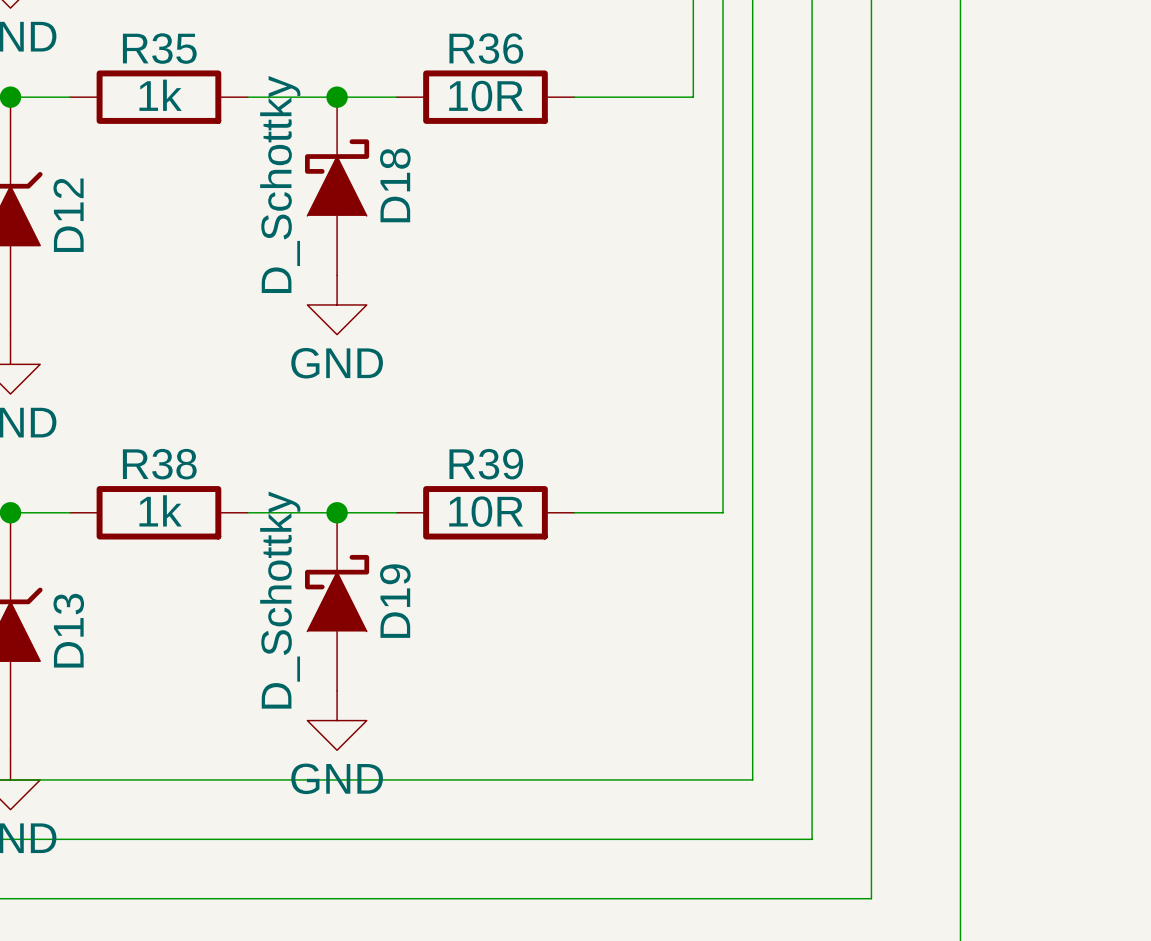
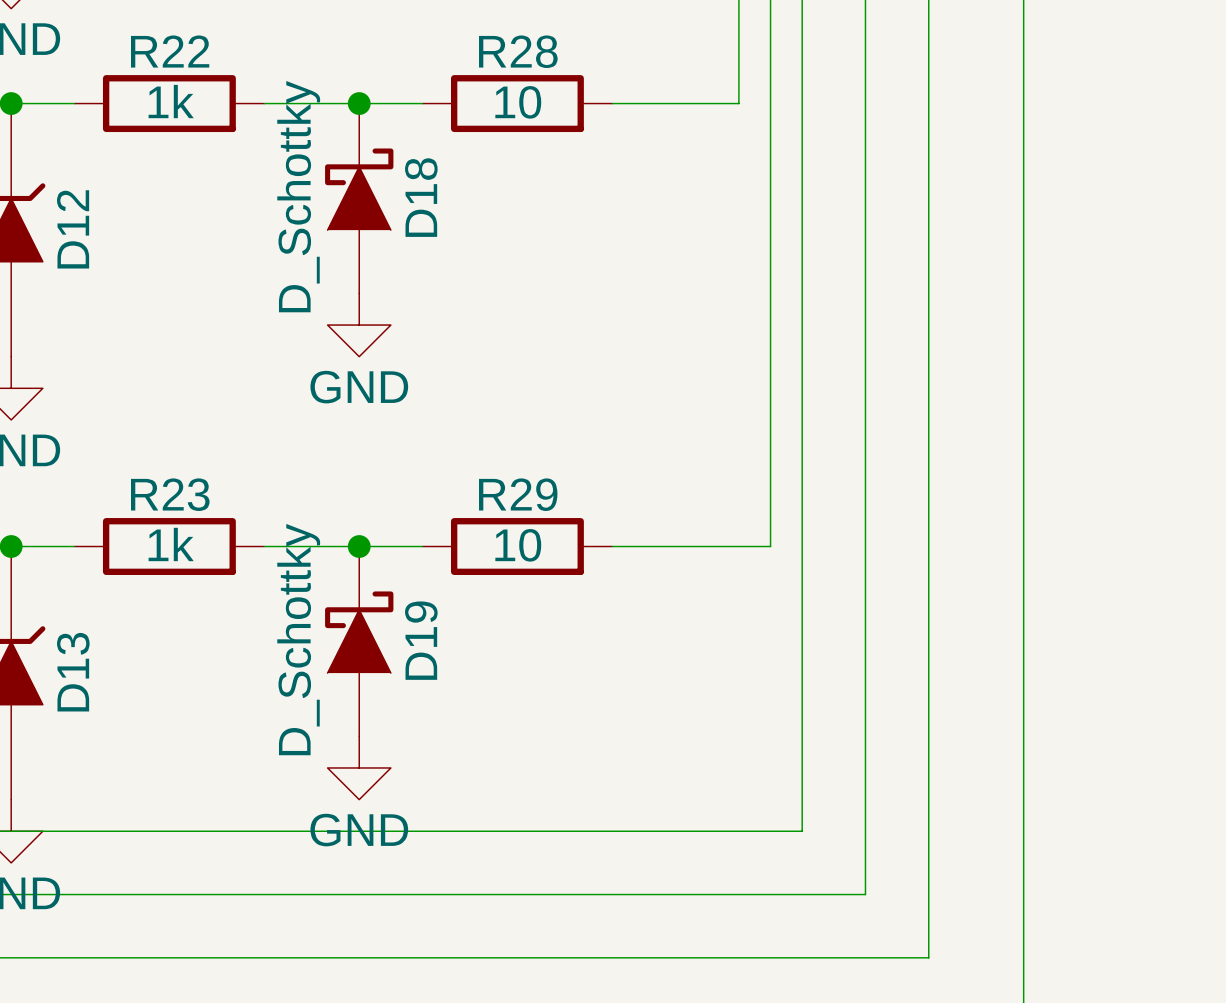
R35 name: R35 (159, 48) -> R22 (170, 51)
R36 name: R36 (486, 48) -> R28 (518, 51)
R36 value: 10R (486, 96) -> 10 (518, 102)
R38 name: R38 (159, 464) -> R23 (170, 494)
R39 name: R39 (486, 464) -> R29 (518, 494)
R39 value: 10R (486, 511) -> 10 (518, 545)

